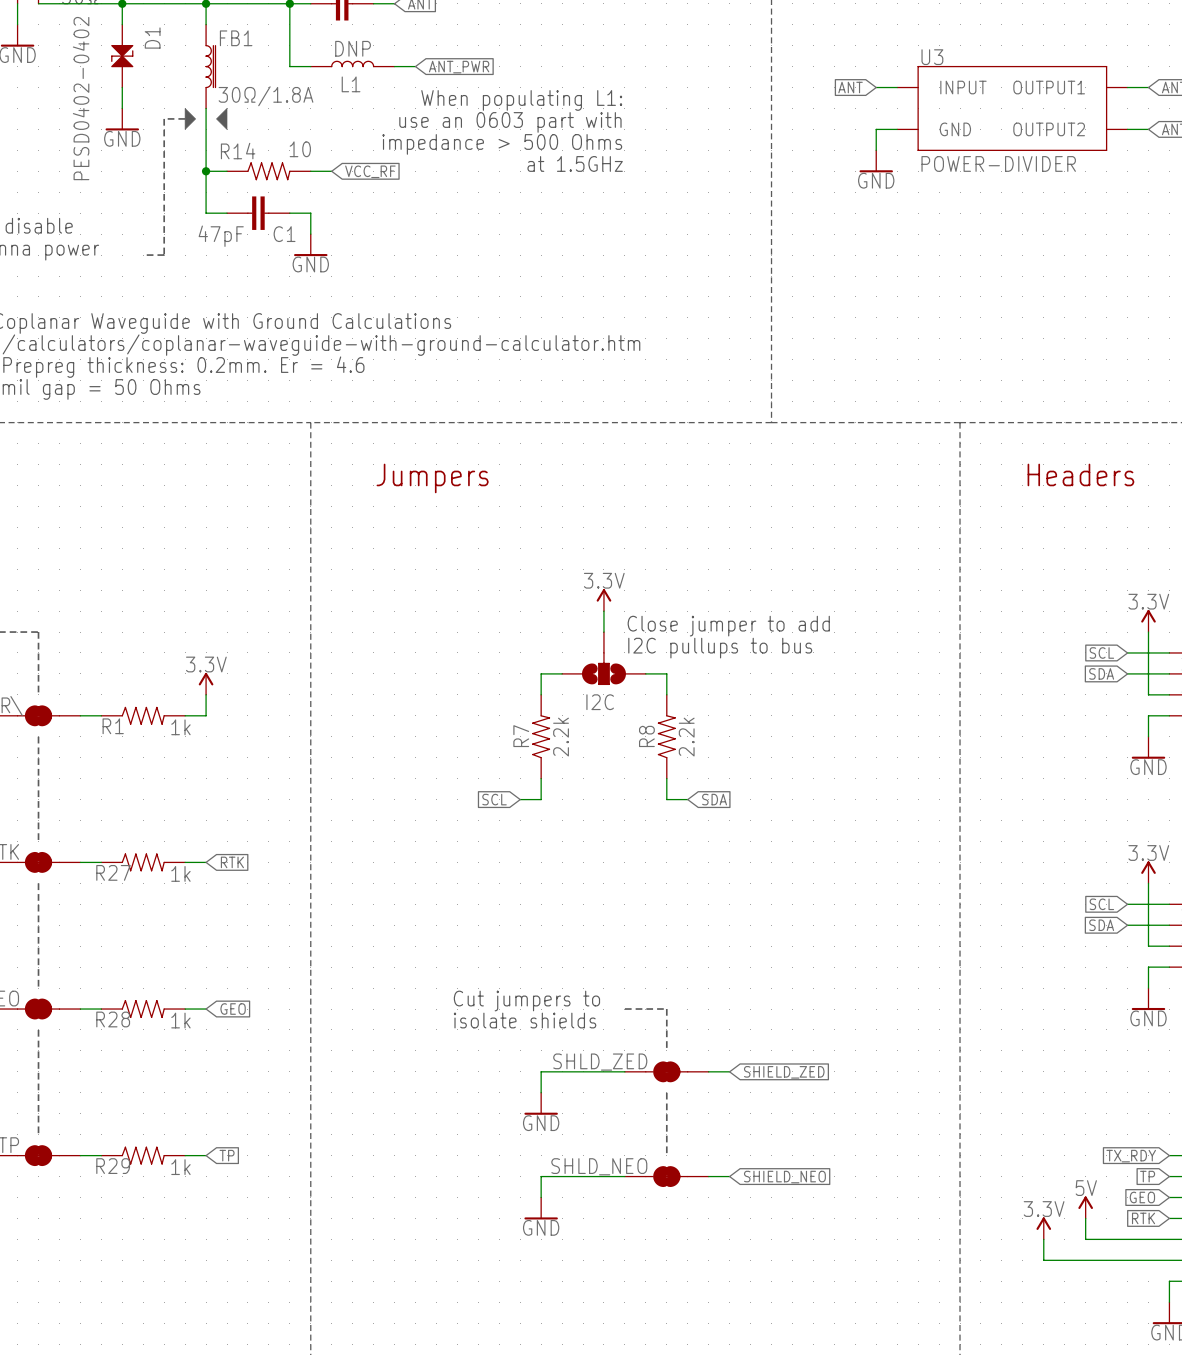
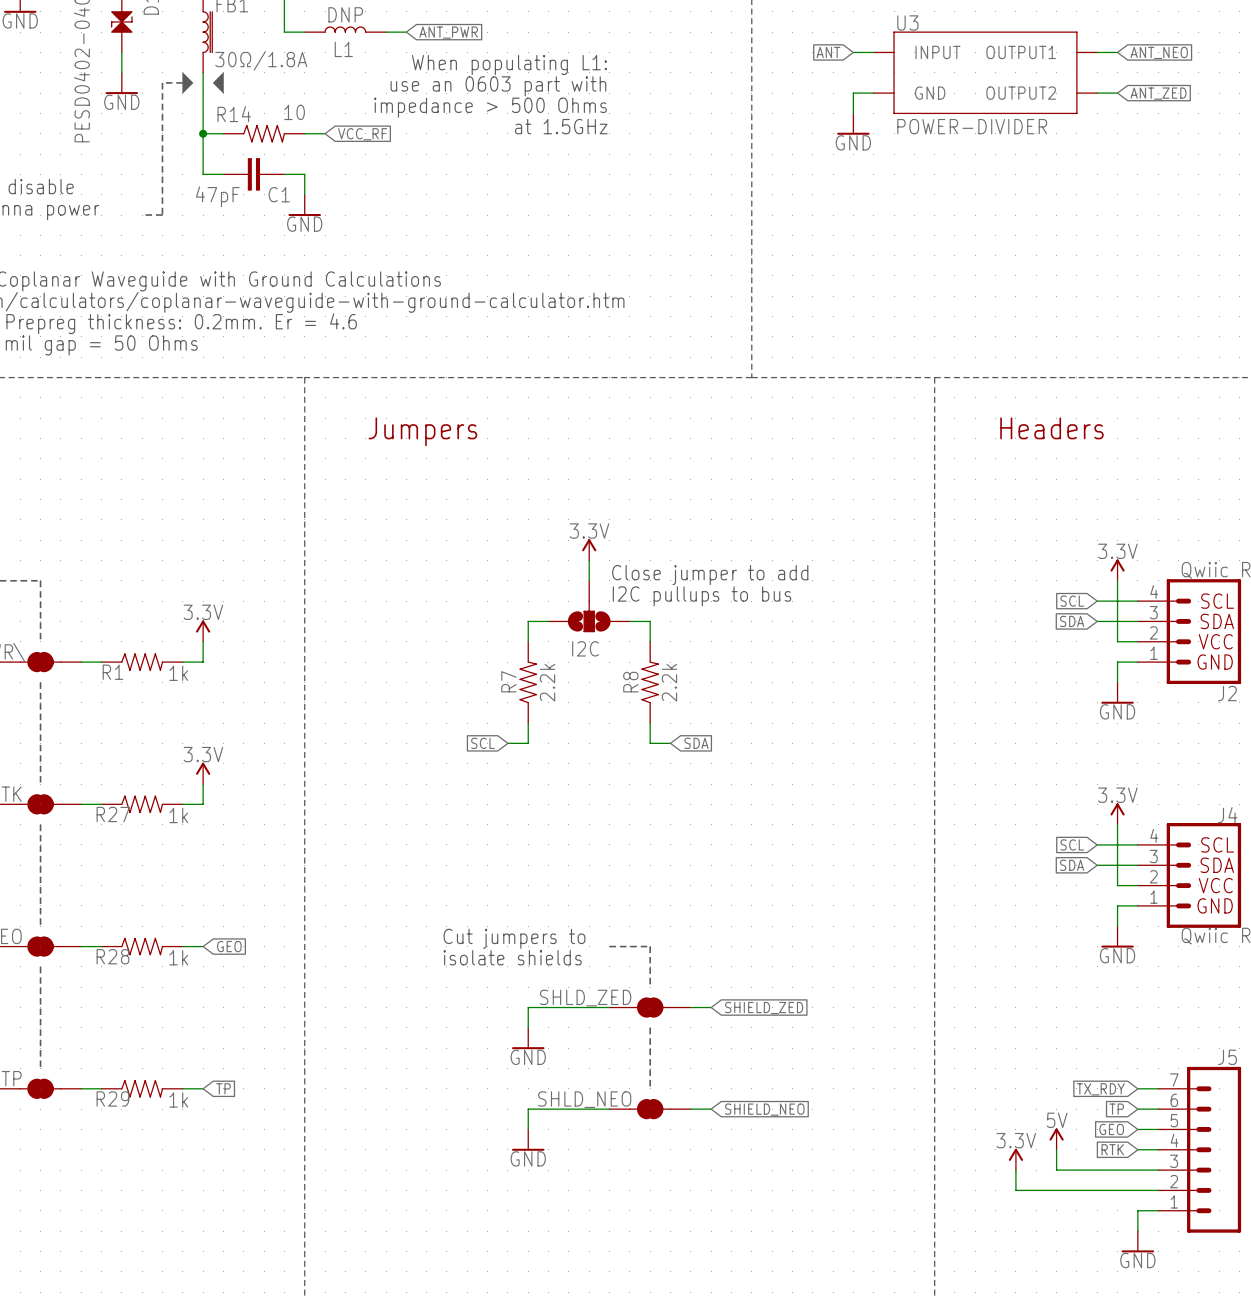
power symbol: none -> 3.3V (203, 773)
wire: none -> (203, 784) (203, 804)
global label: RTK (232, 862) -> none

